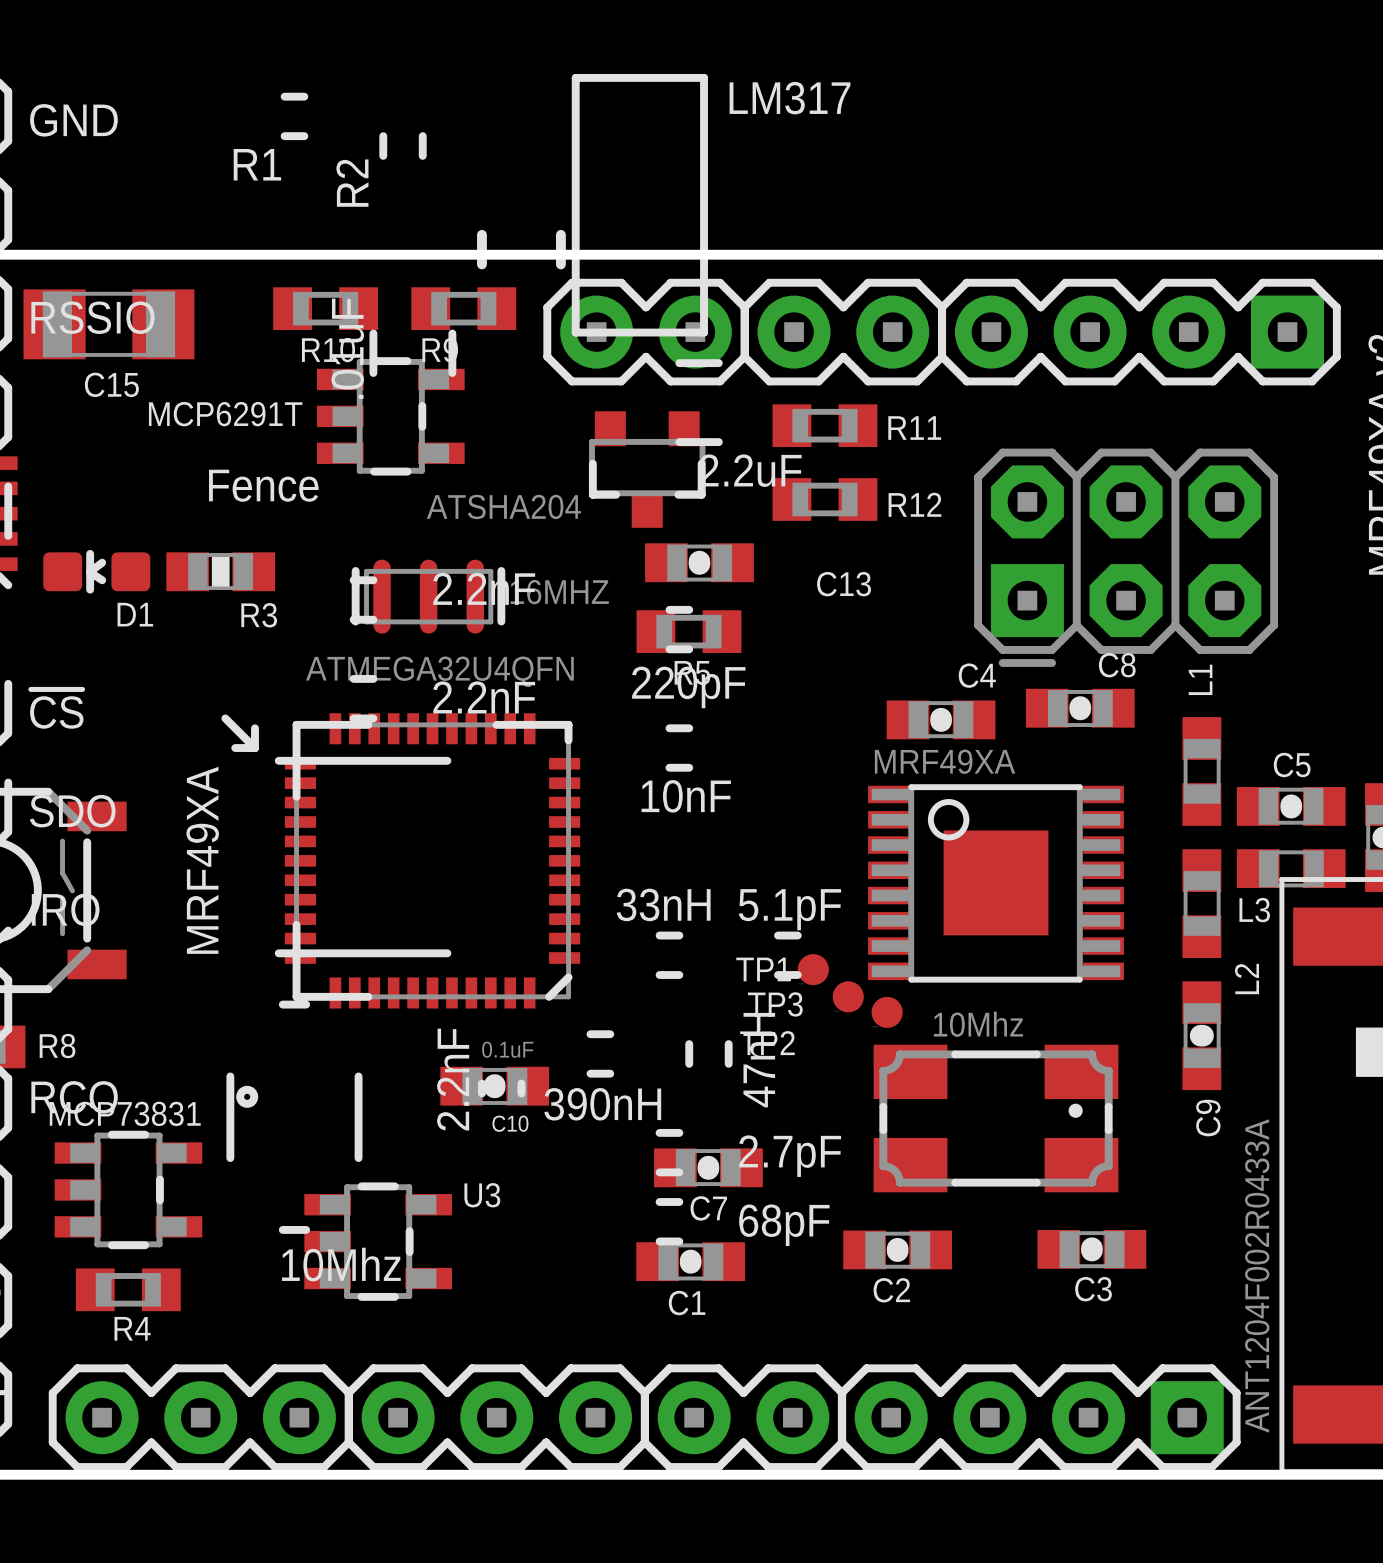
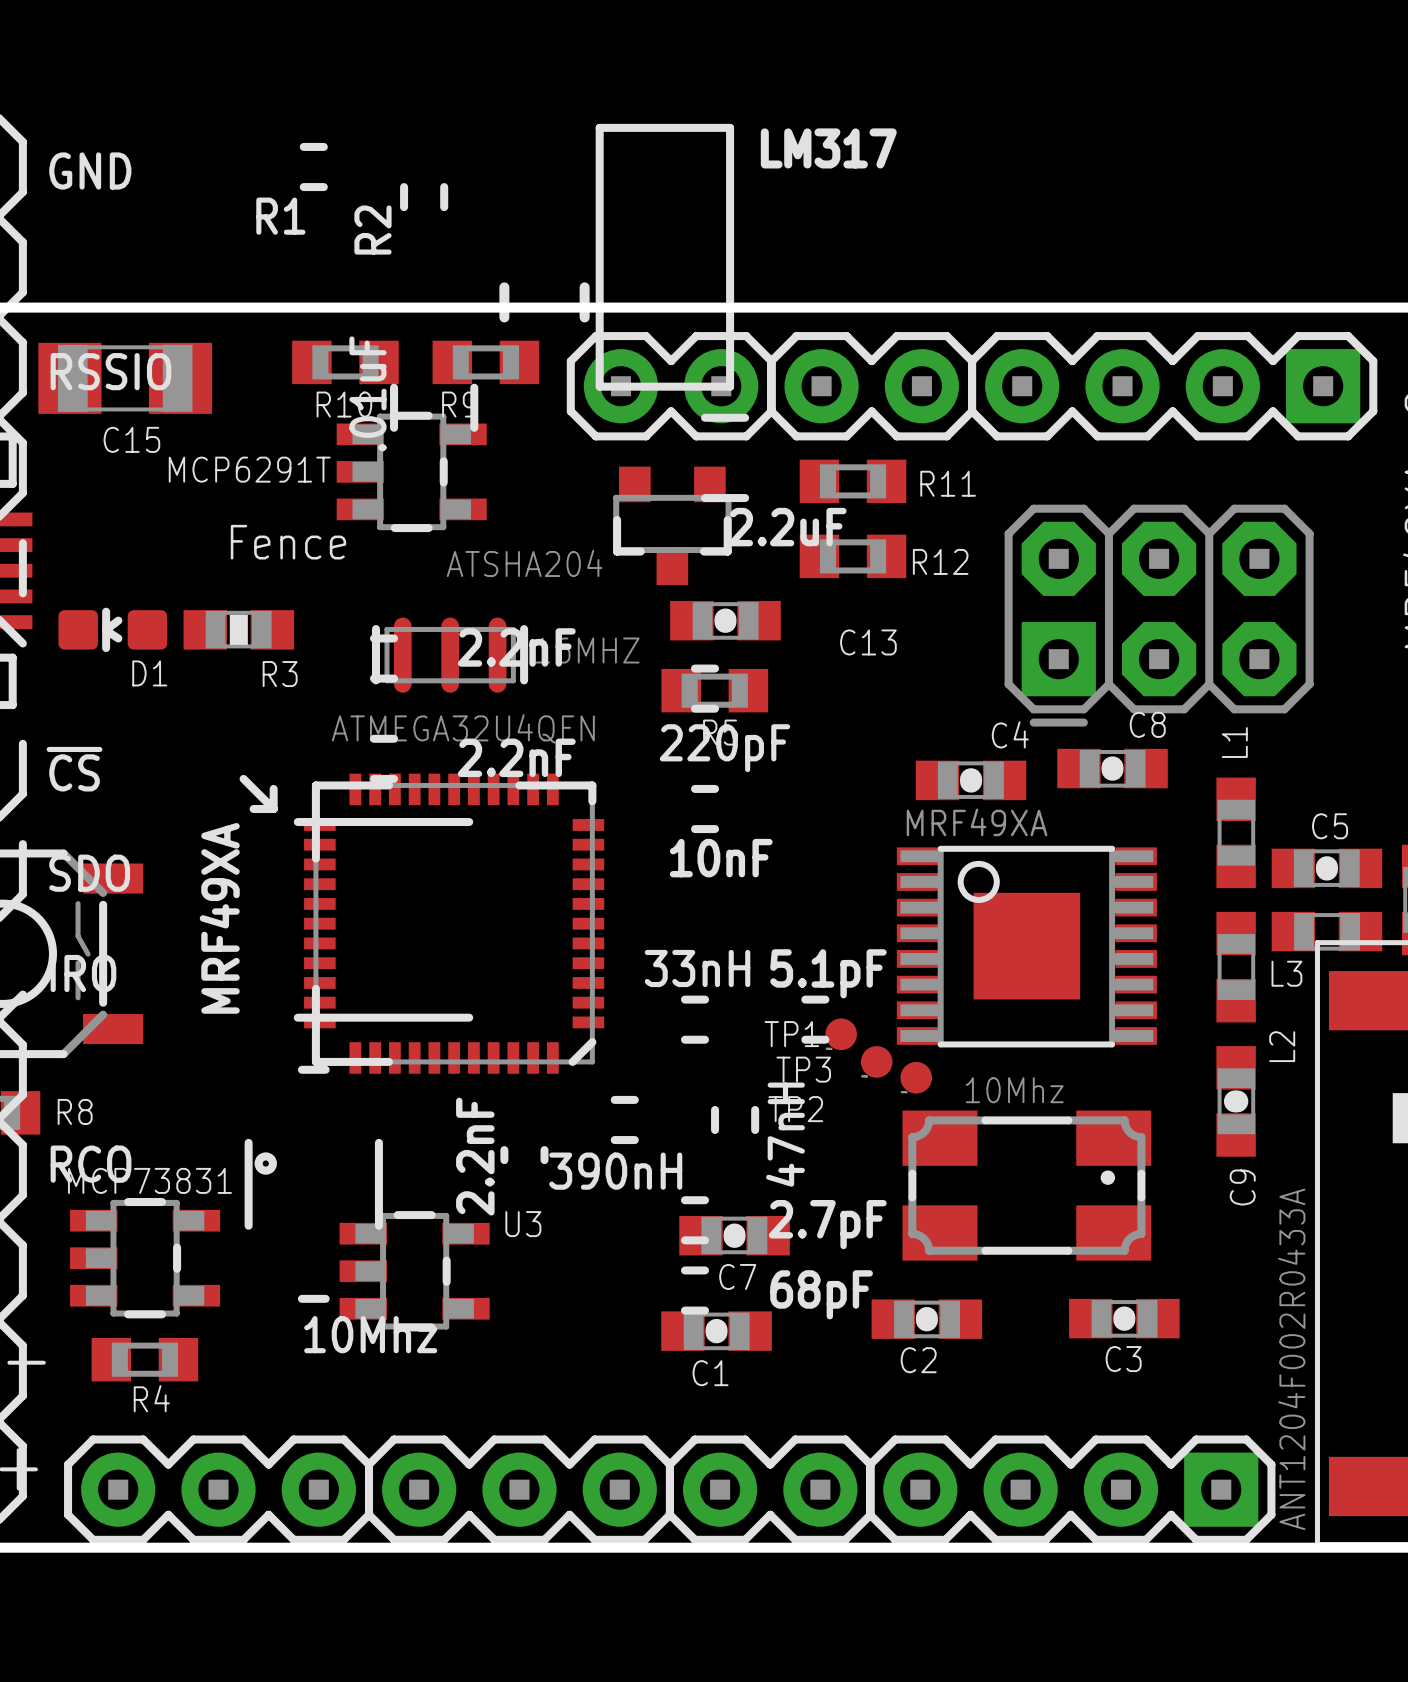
C10: 0.1uF (494, 1086) -> none
U3 position: (378, 1241) -> (414, 1271)

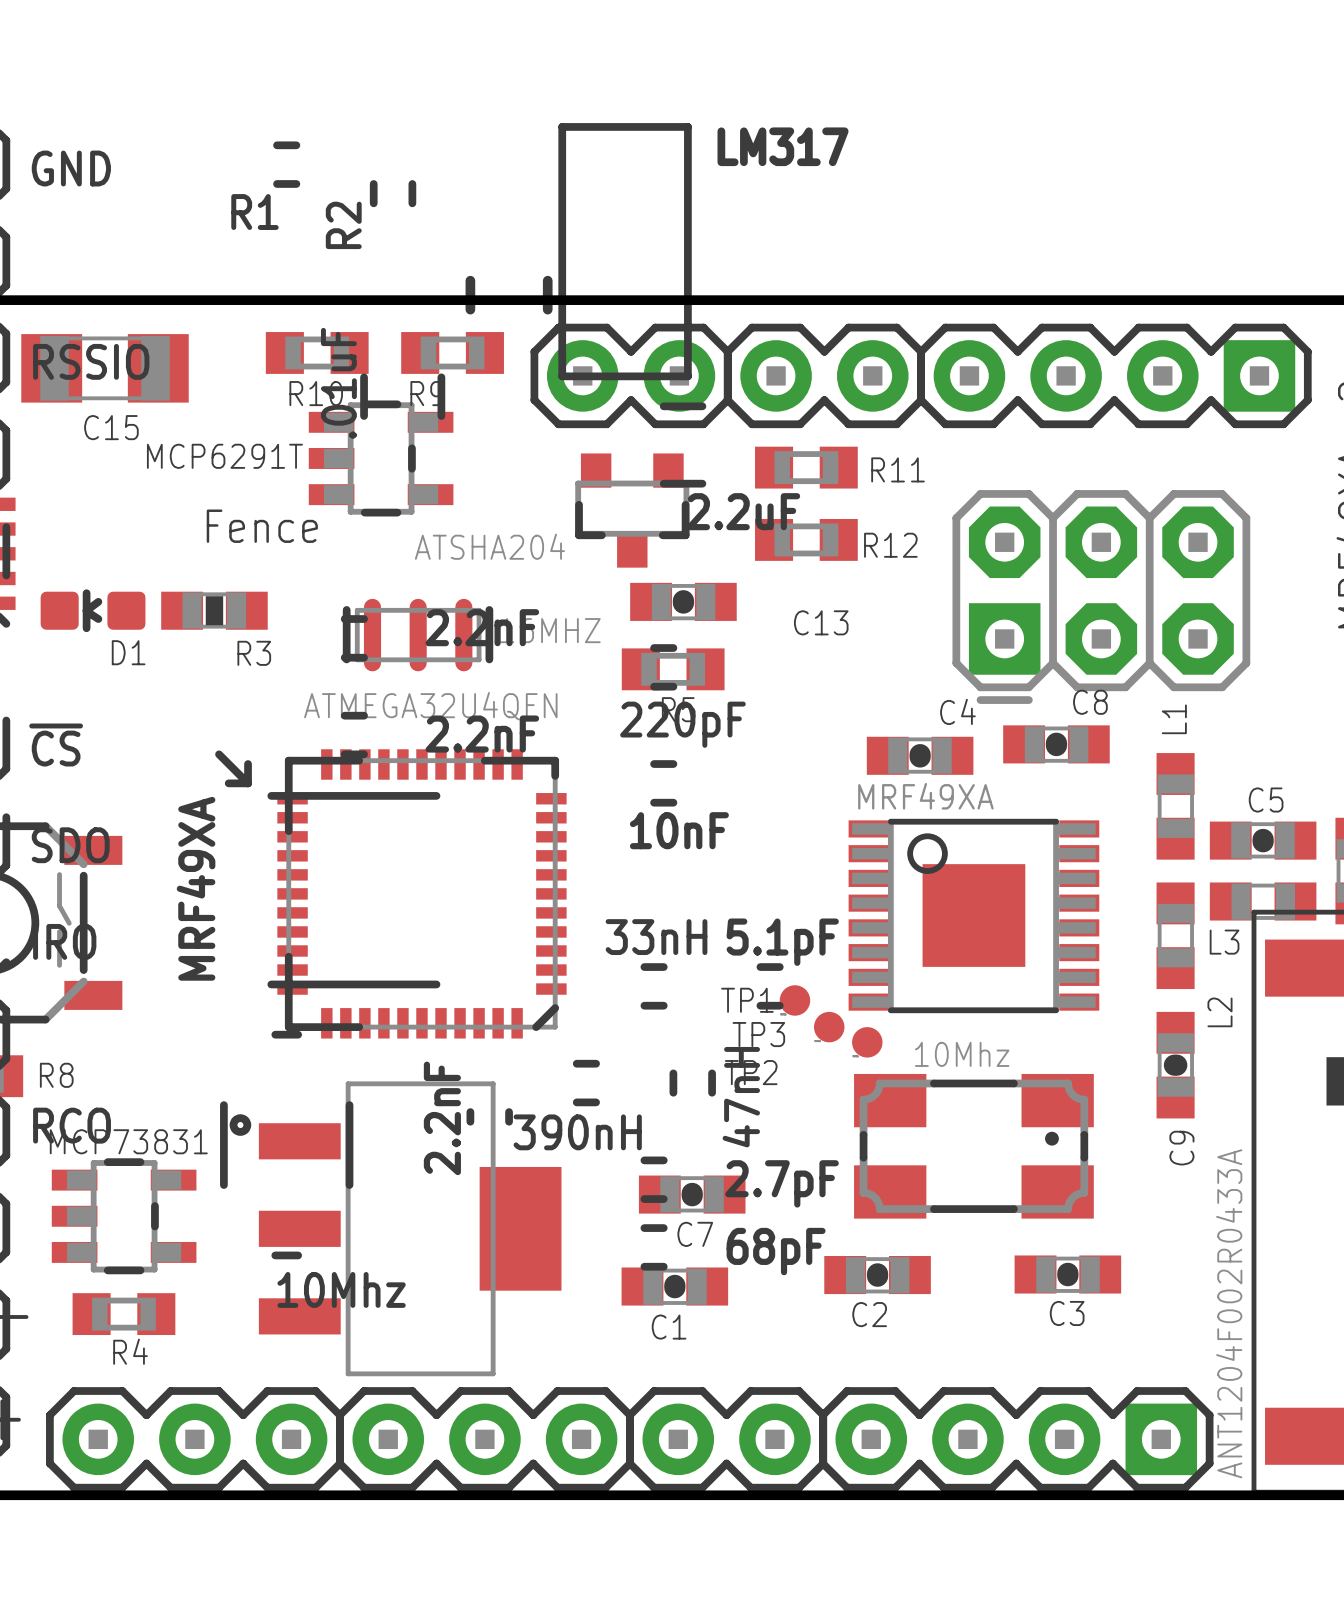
U3: (414, 1271) -> none
part: none -> (410, 1228)

